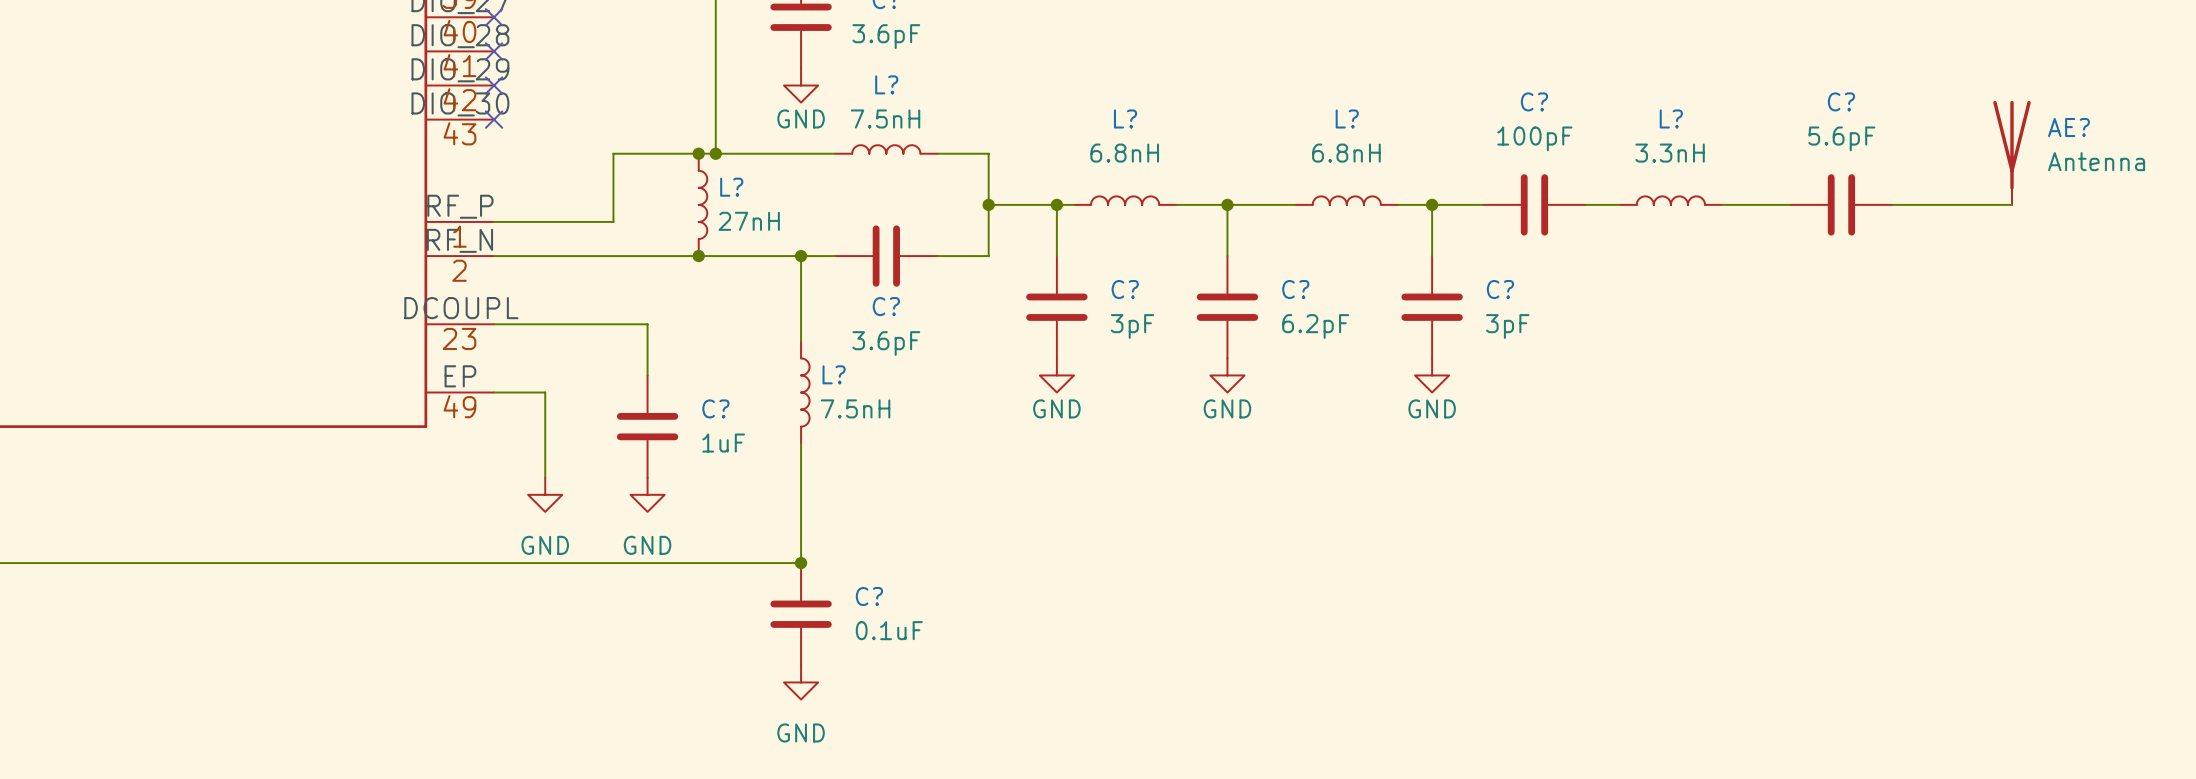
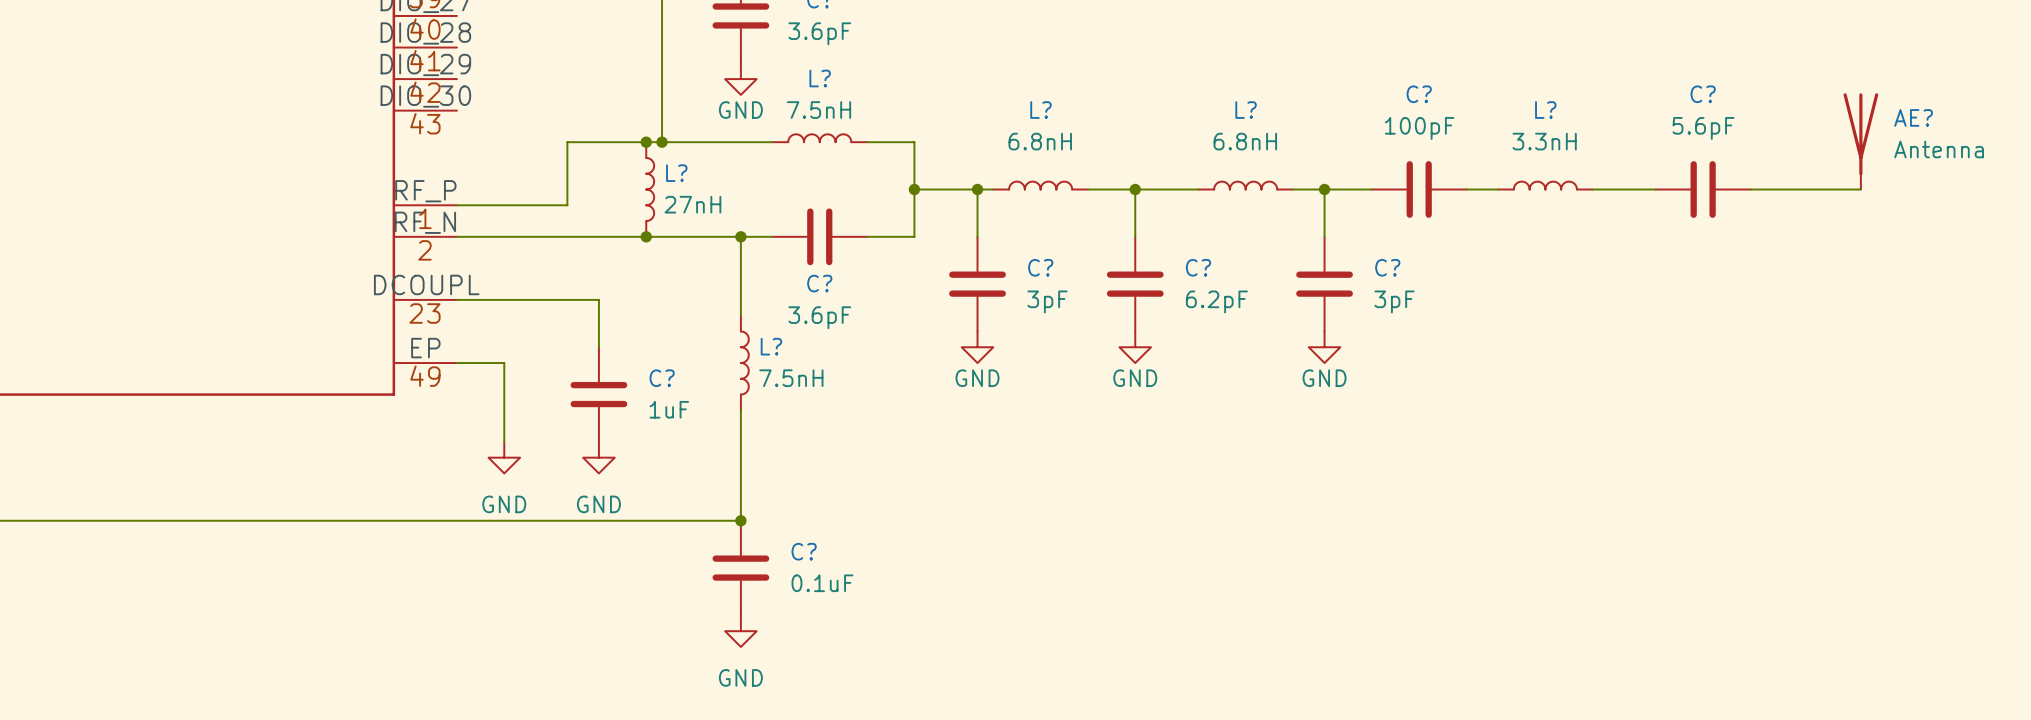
no-connect mark: (494, 17) -> none
no-connect mark: (494, 51) -> none
no-connect mark: (494, 85) -> none
no-connect mark: (494, 119) -> none

